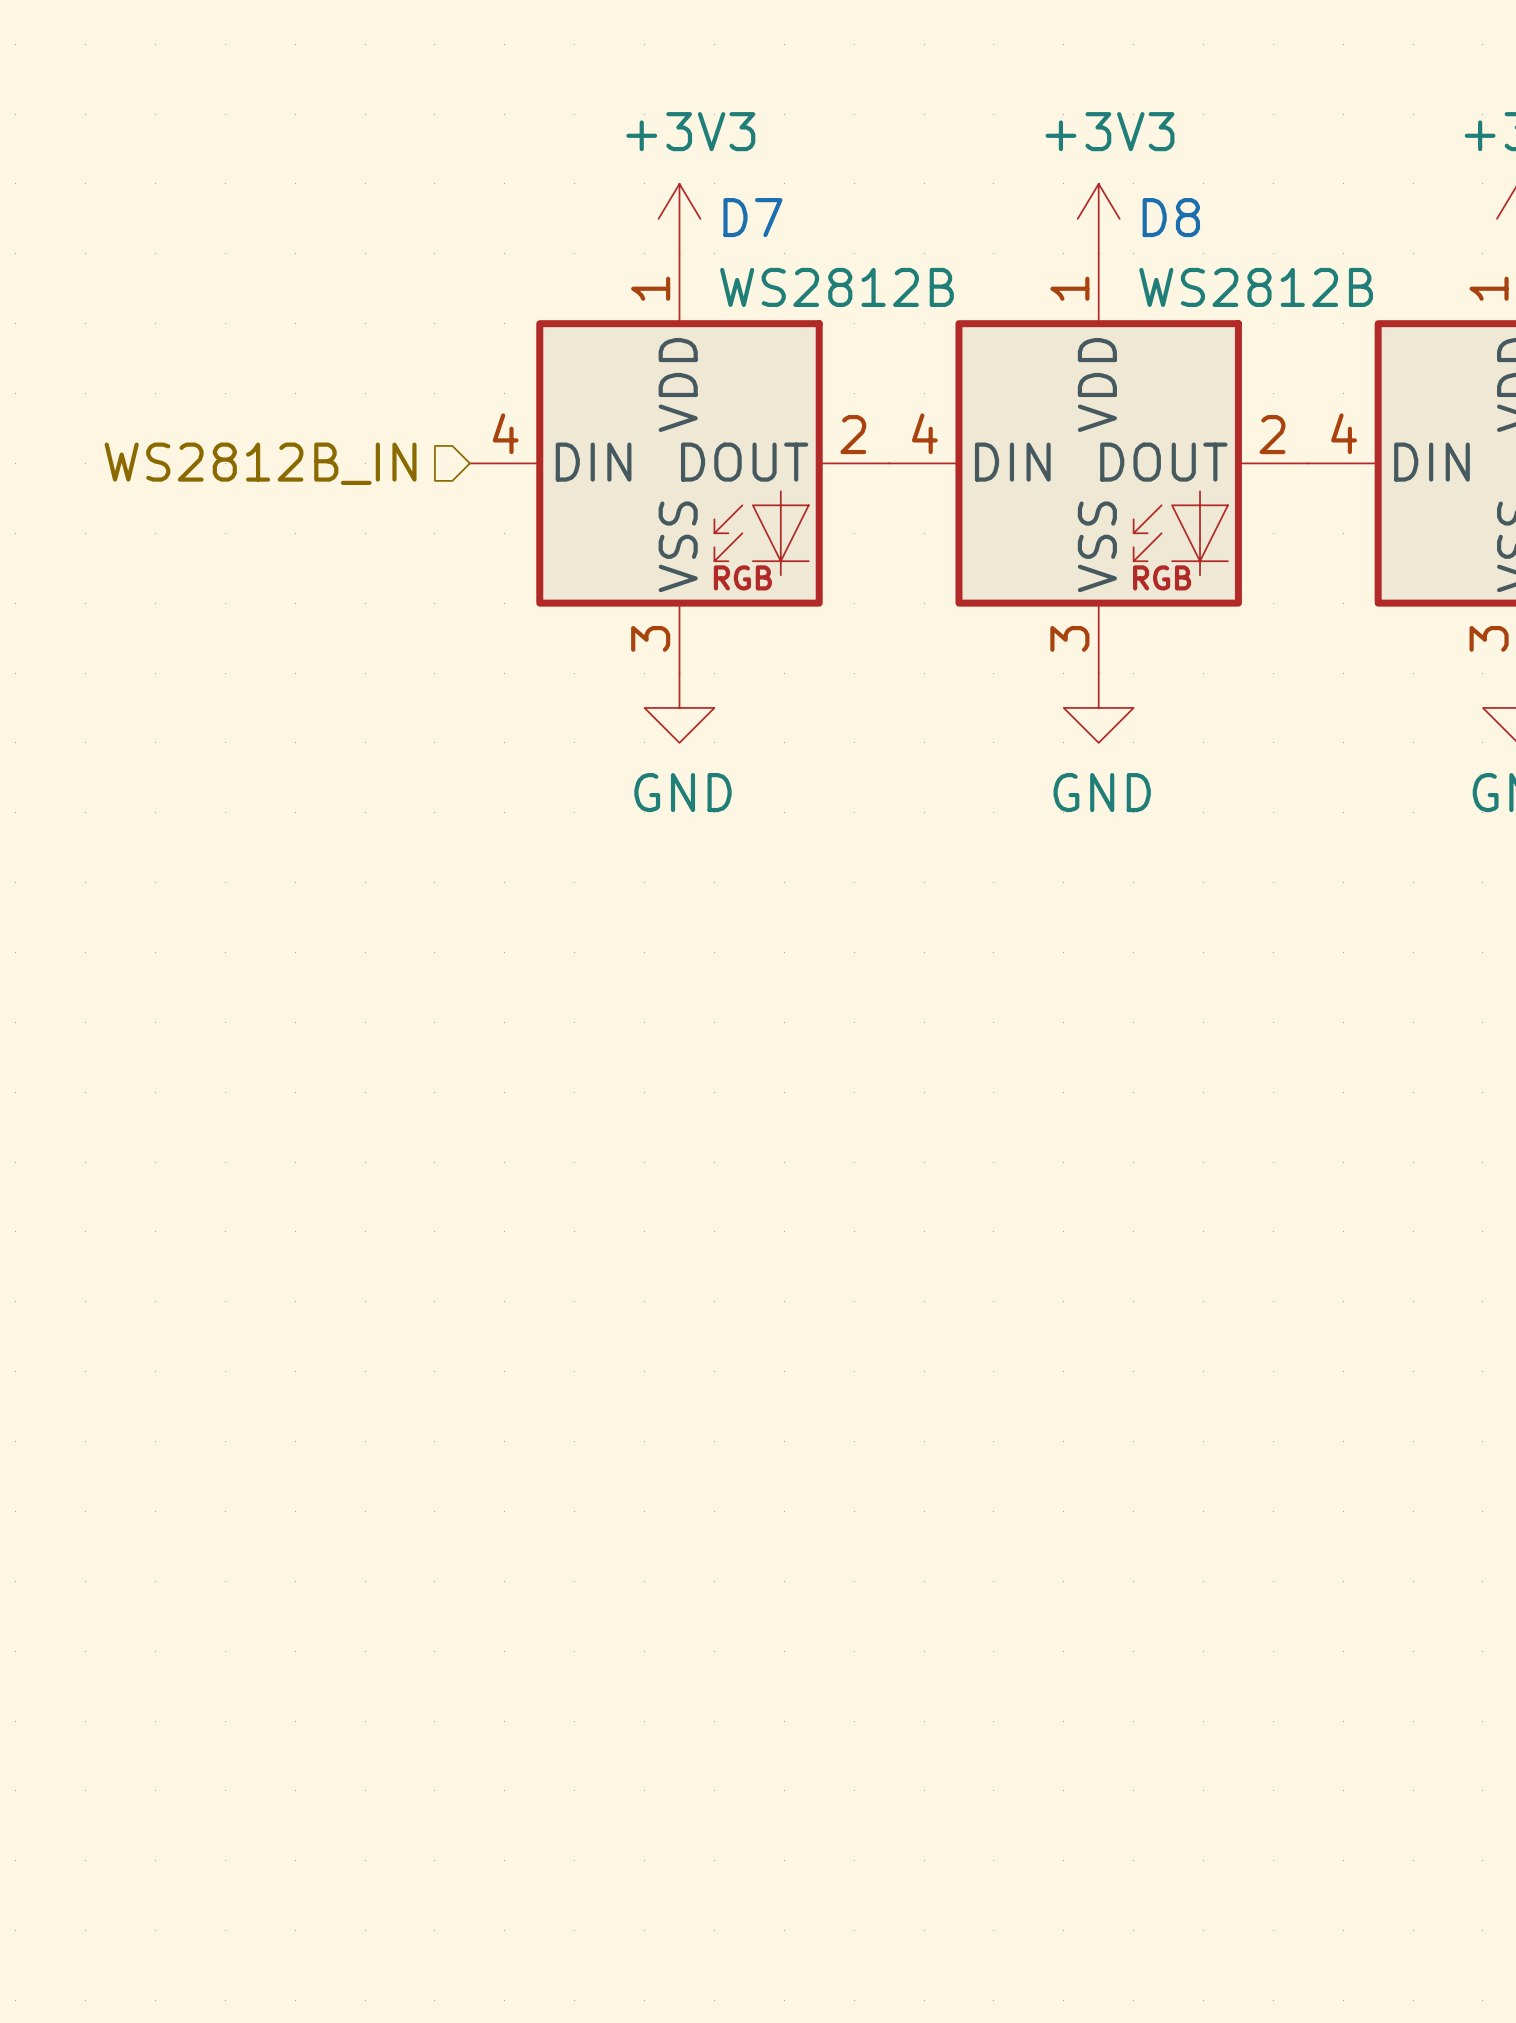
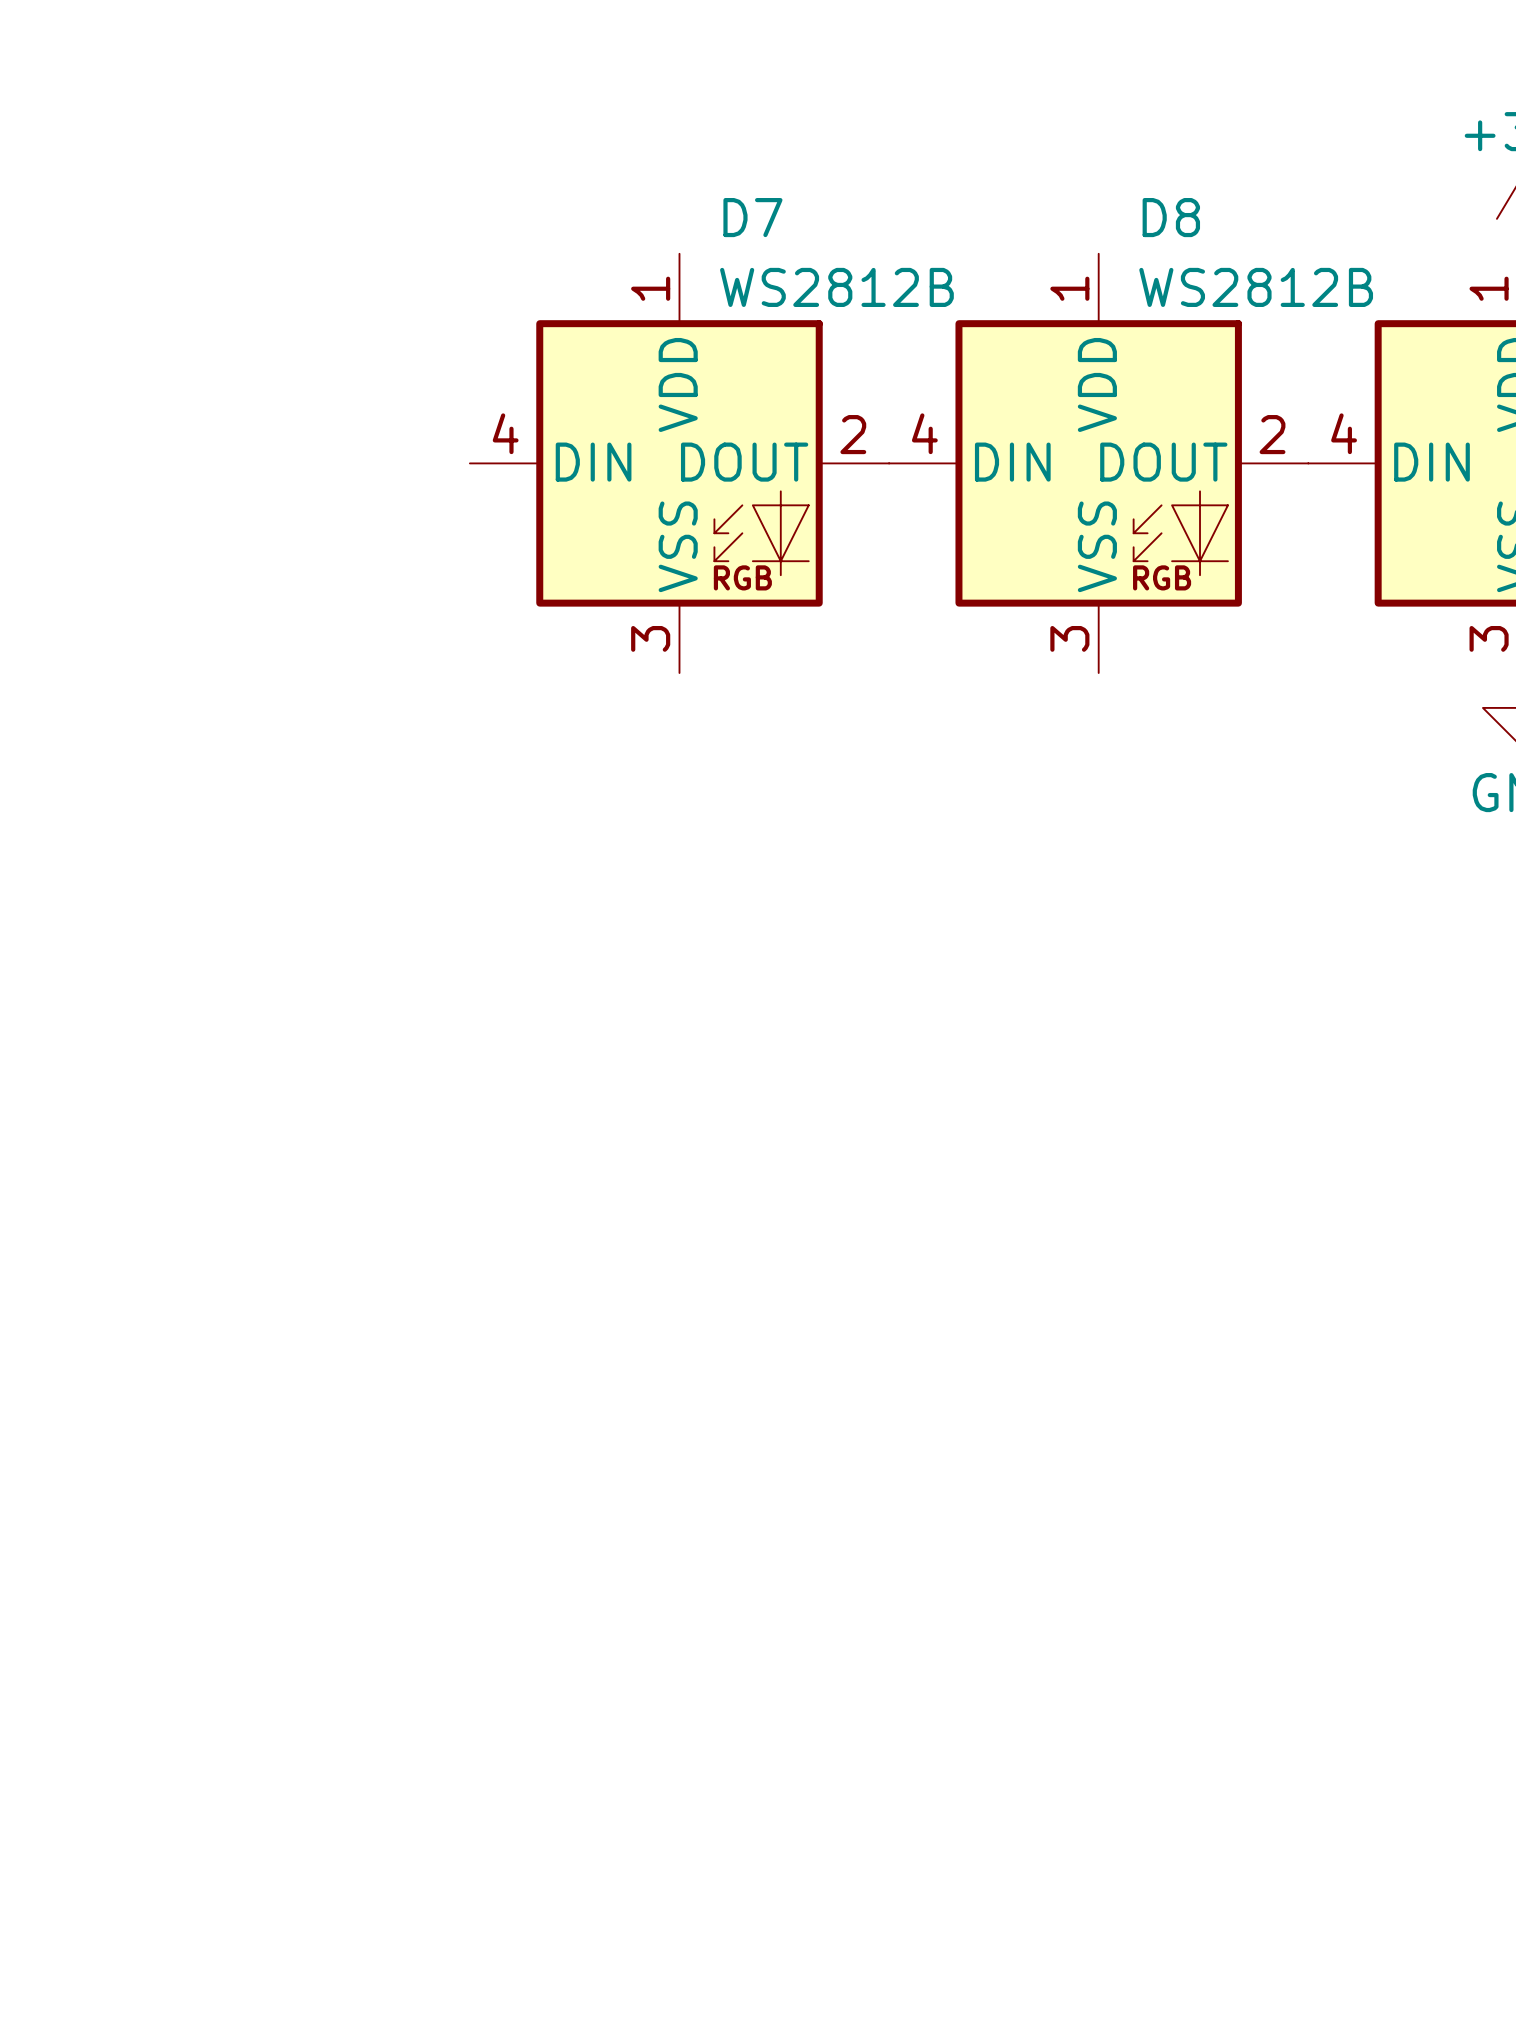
power symbol: +3V3 (679, 218) -> none
power symbol: +3V3 (1098, 218) -> none
hierarchical label: WS2812B_IN (260, 463) -> none
power symbol: GND (679, 707) -> none
power symbol: GND (1098, 707) -> none

